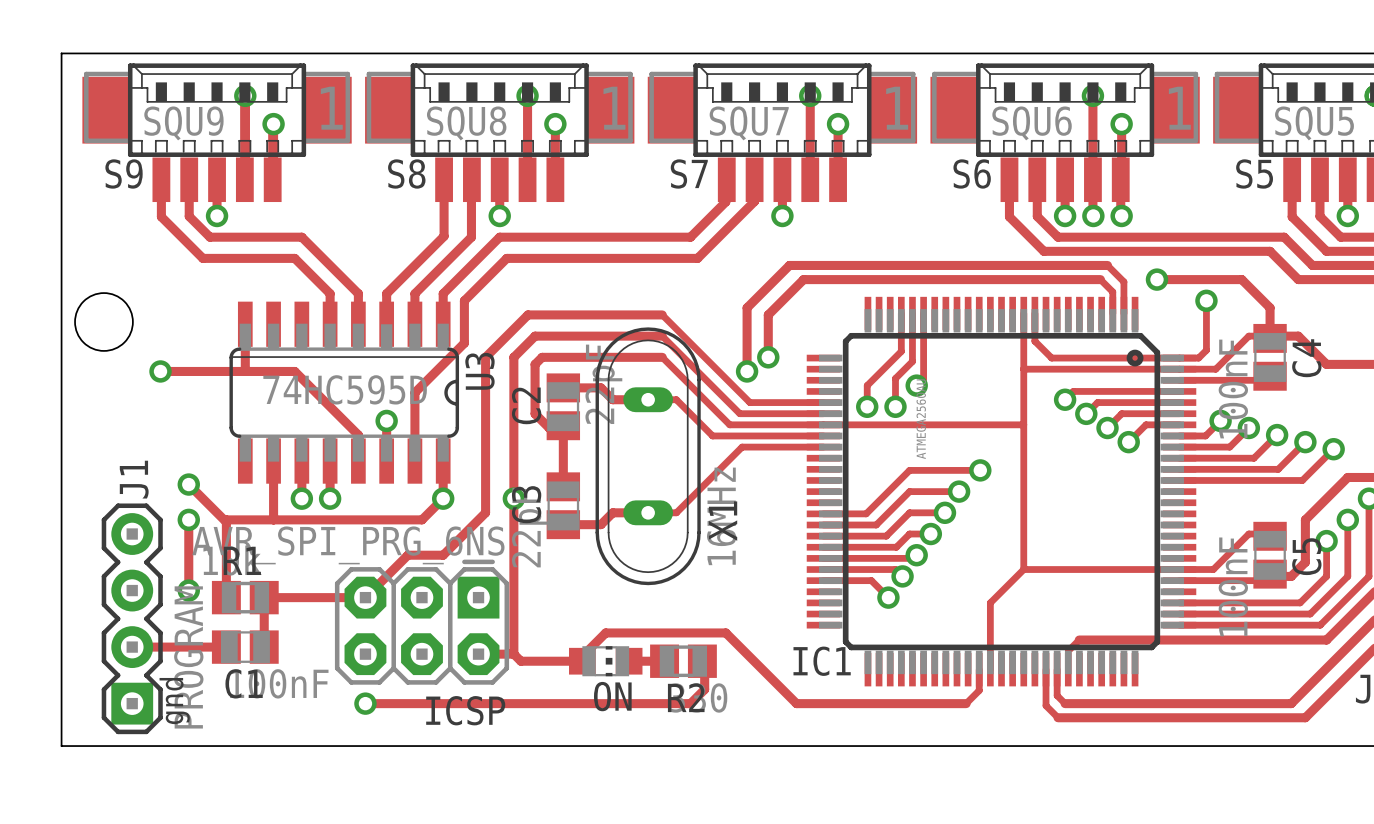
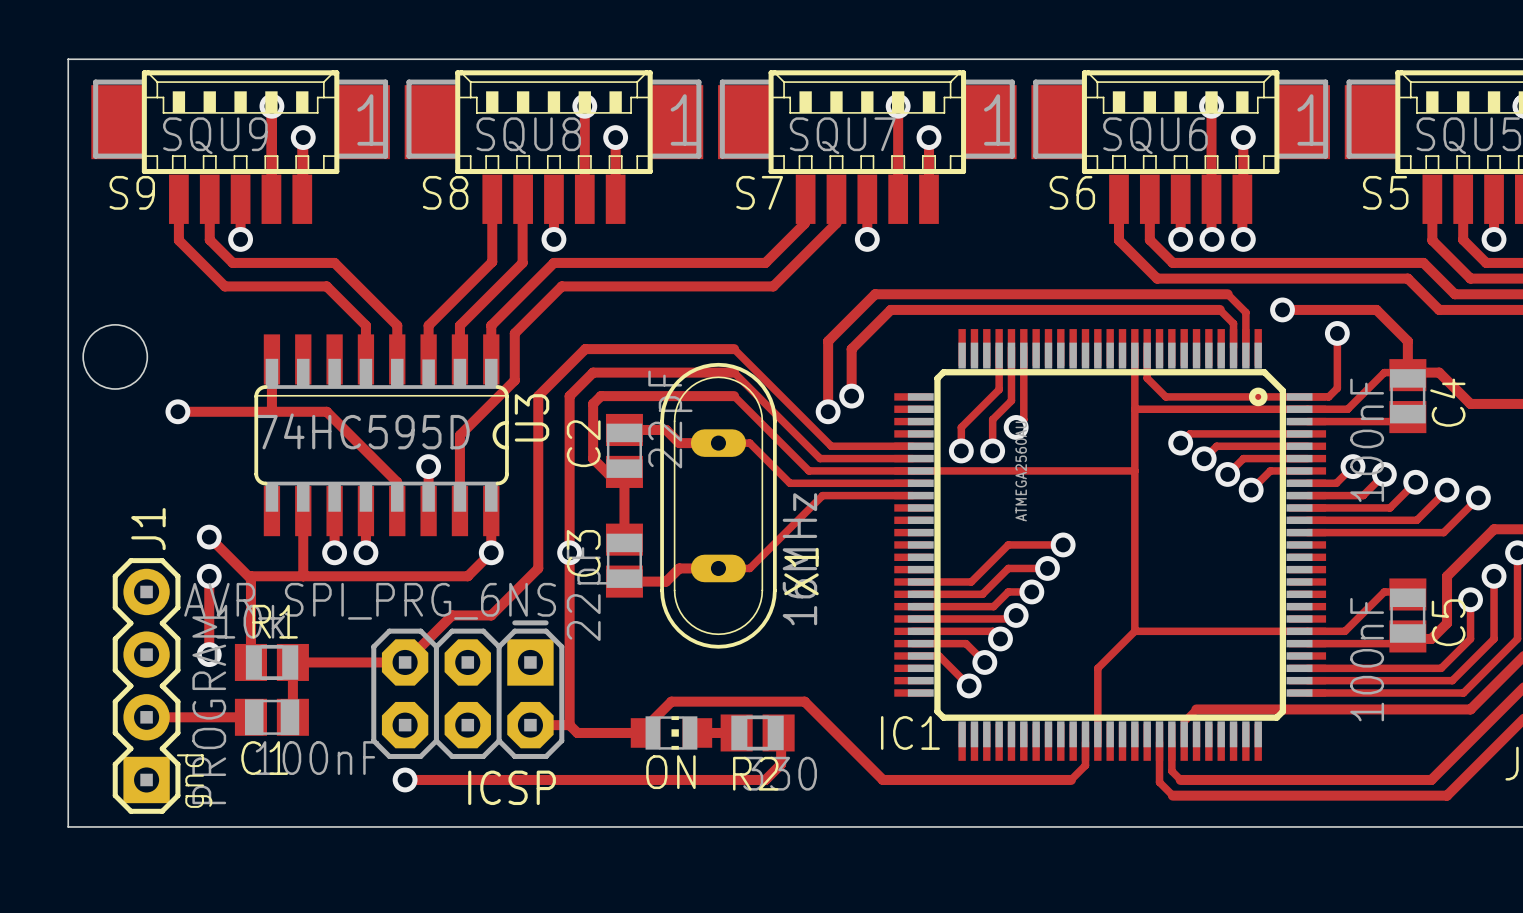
track: (980, 470) (909, 470) (866, 513) (823, 513) -> none
via: (980, 470) -> none
track: none -> (912, 655) (939, 655) (969, 685)
via: none -> (969, 685)

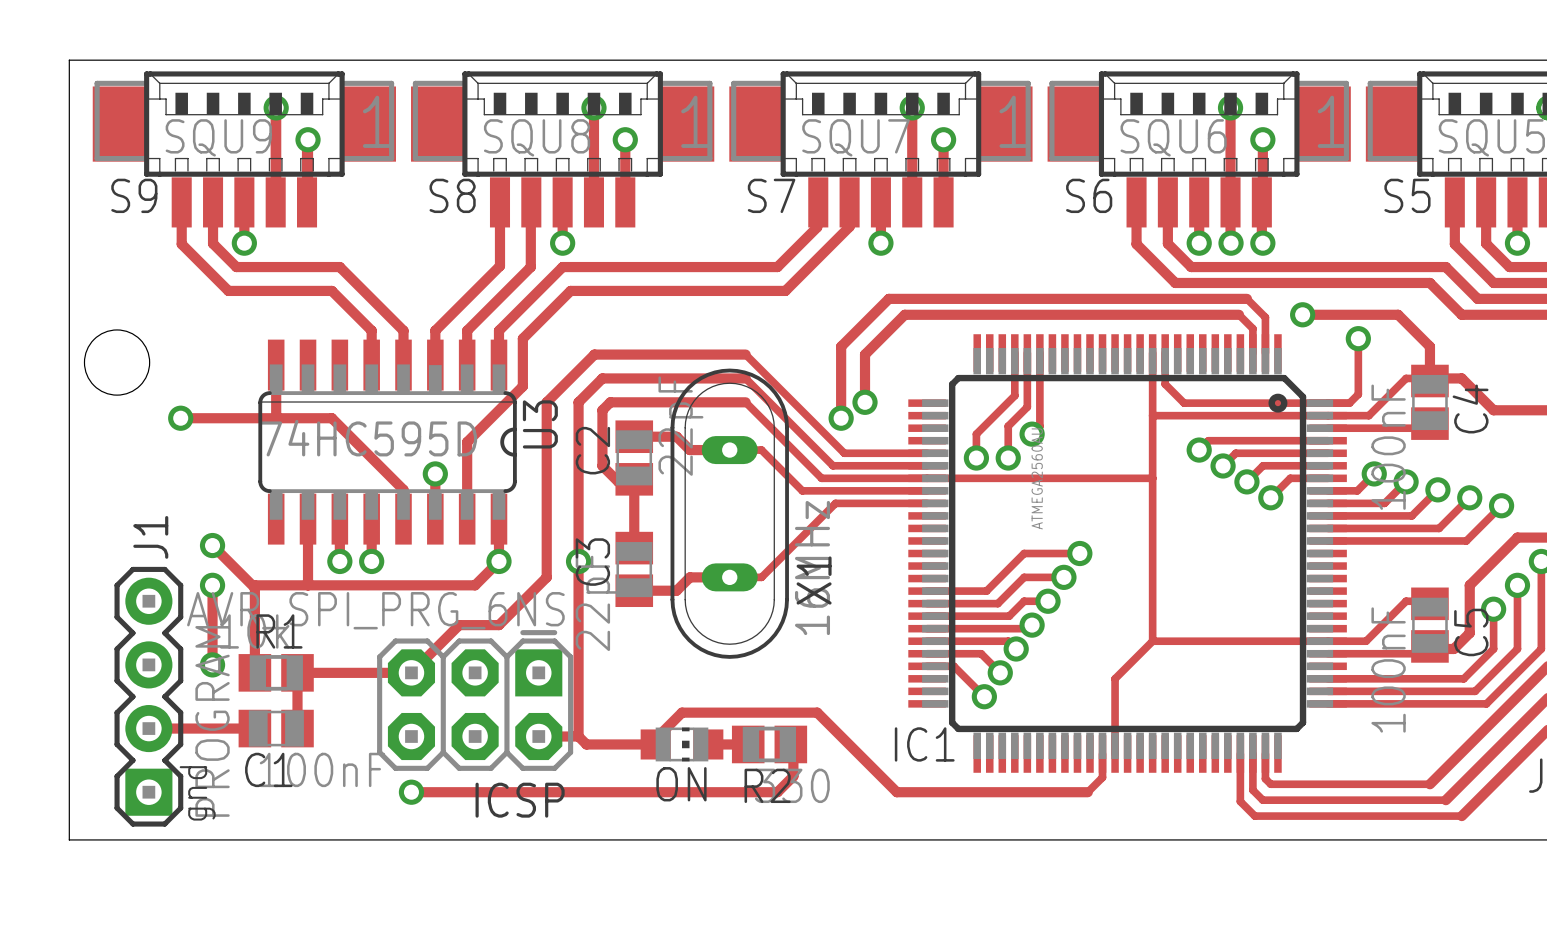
track: (1470, 709) (1196, 709) (1184, 721) -> (1493, 720) (1429, 784) (1270, 784) (1265, 778) (1265, 753)
track: (1159, 742) (1159, 782) (1172, 795) (1447, 795) -> (1240, 753) (1240, 801) (1254, 816) (1461, 816) (1469, 808)
track: (1171, 742) (1171, 771) (1180, 779) (1431, 779) -> (1252, 753) (1252, 790) (1262, 800) (1445, 800) (1453, 792)

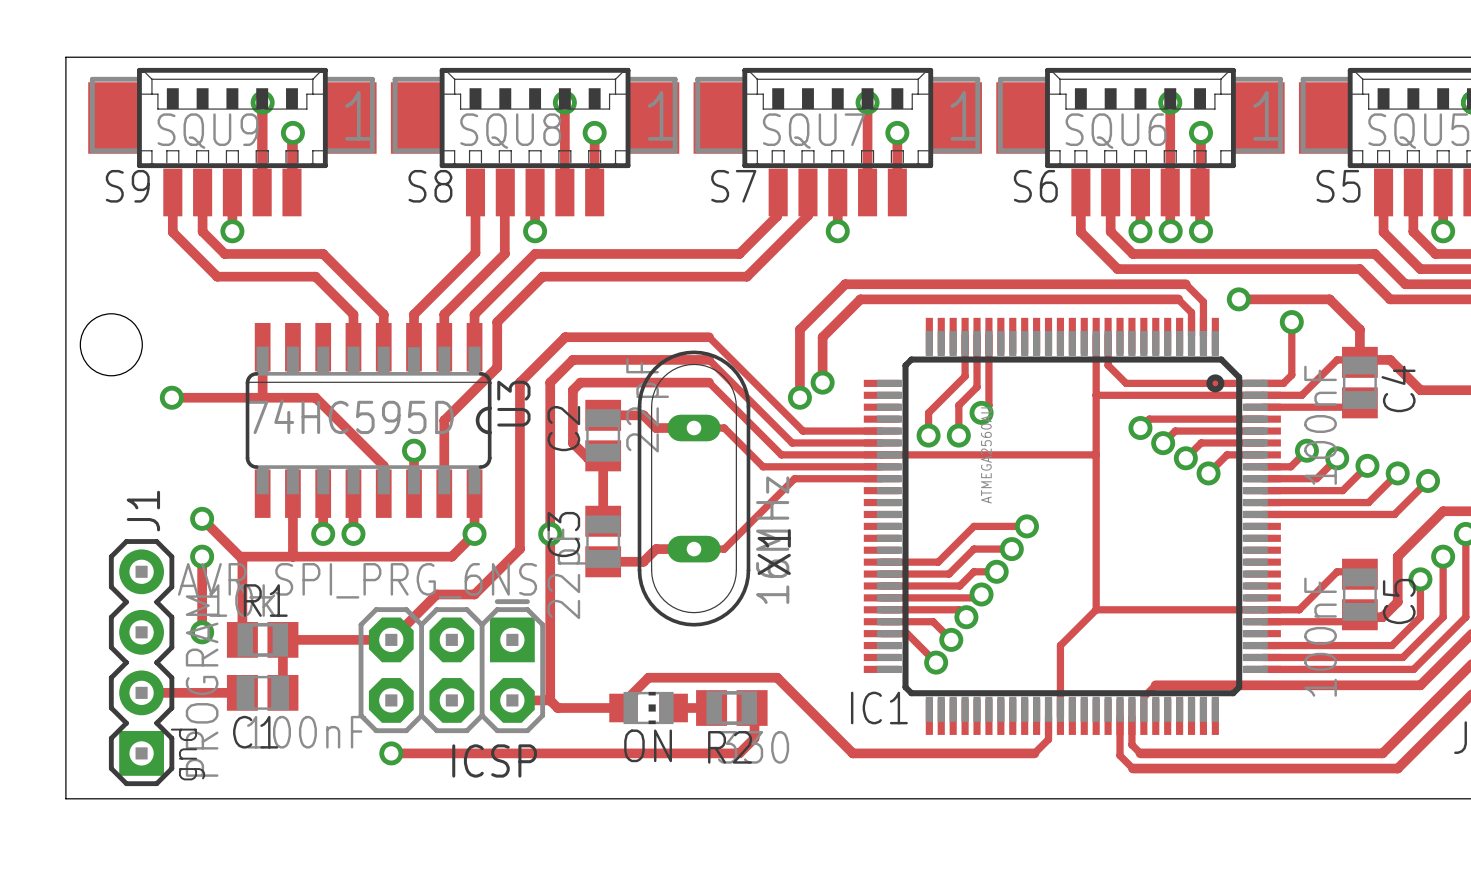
track: (1493, 720) (1429, 784) (1270, 784) (1265, 778) (1265, 753) -> (1420, 685) (1155, 685) (1143, 697)
track: (1240, 753) (1240, 801) (1254, 816) (1461, 816) (1469, 808) -> (1120, 717) (1120, 755) (1132, 768) (1397, 768)
track: (1252, 753) (1252, 790) (1262, 800) (1445, 800) (1453, 792) -> (1131, 717) (1131, 744) (1140, 753) (1382, 753)

